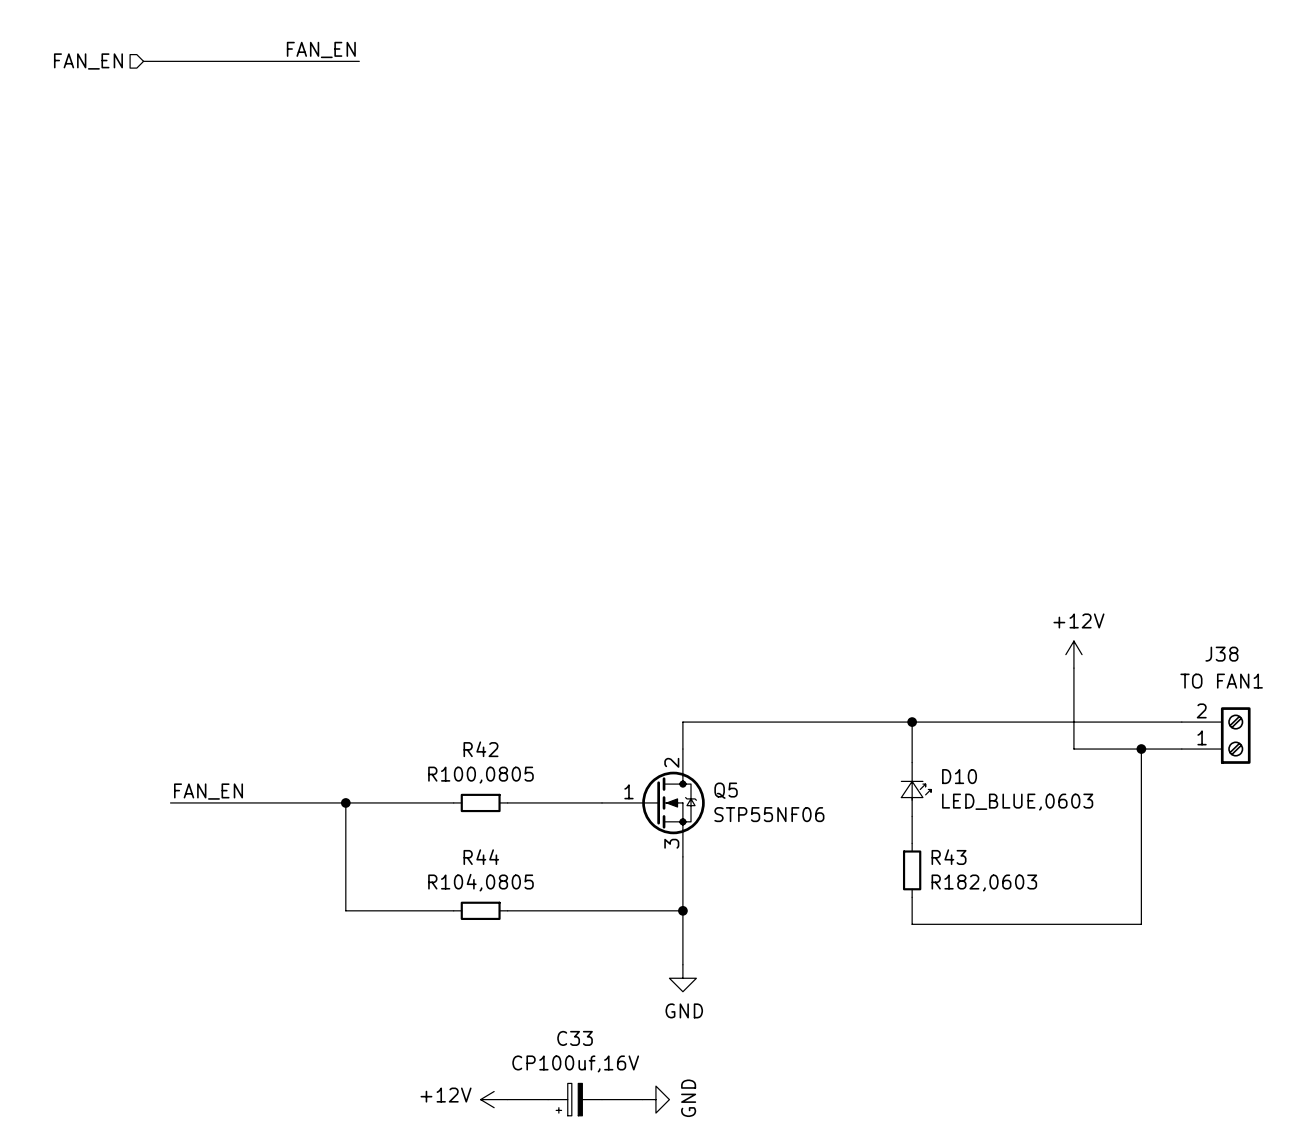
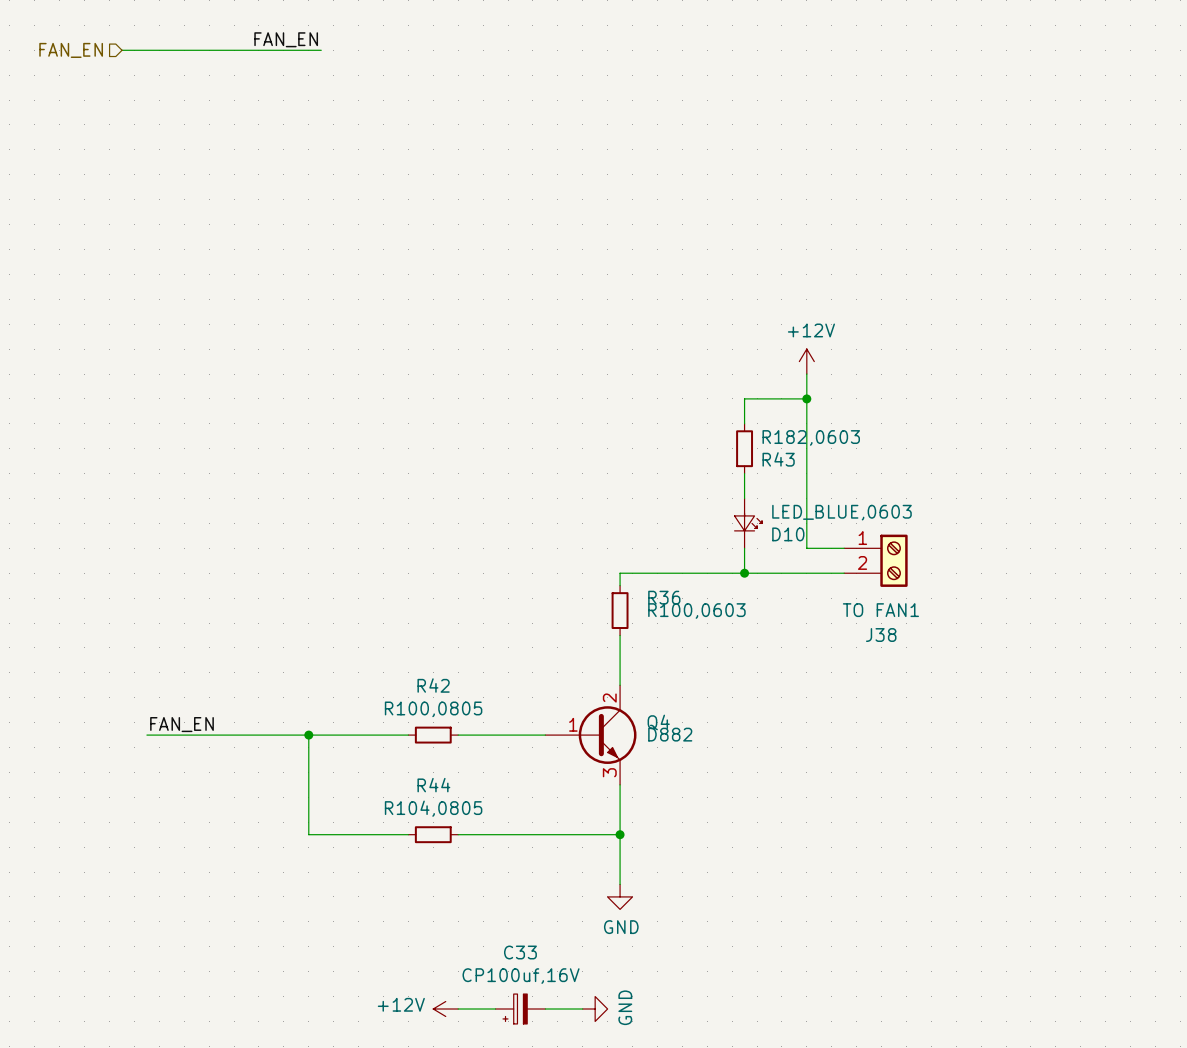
power symbol: none -> +12V (806, 361)
wire: none -> (806, 374) (806, 548) (844, 548)
wire: none -> (806, 398) (744, 398) (744, 423)
junction: none -> (806, 398)
wire: none -> (744, 473) (744, 498)
junction: none -> (744, 573)
wire: none -> (844, 573) (620, 573) (620, 585)
power symbol: +12V (1073, 654) -> none
R36: none -> R100,0603 (620, 610)
wire: (1073, 668) (1073, 749) (1181, 749) -> none
wire: (682, 722) (1181, 722) -> (620, 660) (620, 635)
wire: (912, 722) (912, 762) -> none
junction: (912, 722) -> none
J38 position: (1216, 735) -> (875, 560)
J38 flip: as is (1235, 735) -> up-down (893, 560)
wire: (1141, 749) (1141, 924) (912, 924) (912, 897) -> none
junction: (1141, 749) -> none
D10 position: (916, 789) -> (748, 523)
D10 flip: as is (916, 790) -> up-down (748, 522)
Q4: none -> D882 (590, 735)
Q5: STP55NF06 (653, 802) -> none
wire: (912, 816) (912, 843) -> (744, 548) (744, 573)
R43 name position: R43 (949, 857) -> R43 (778, 459)
R43 position: (912, 870) -> (744, 448)
R43 value position: R182,0603 (984, 882) -> R182,0603 (811, 437)

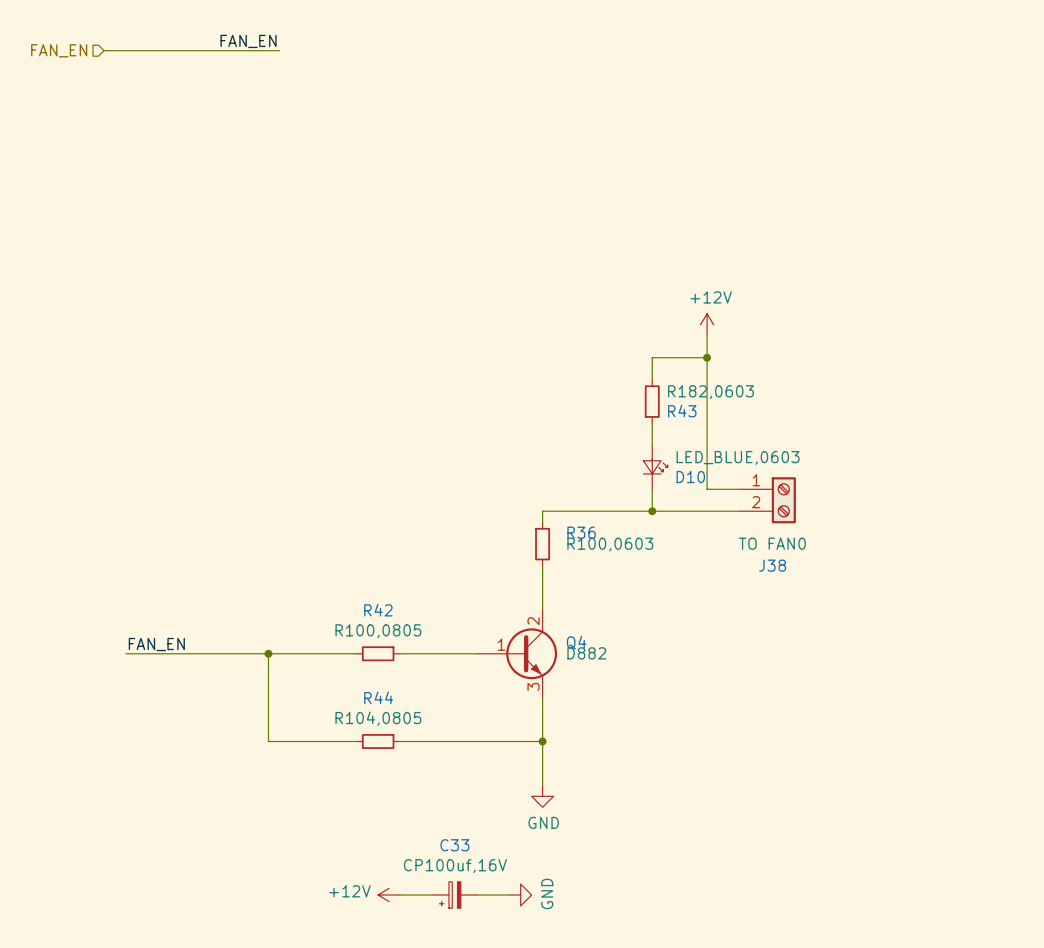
J38 value: TO FAN1 (880, 610) -> TO FAN0 (772, 543)

